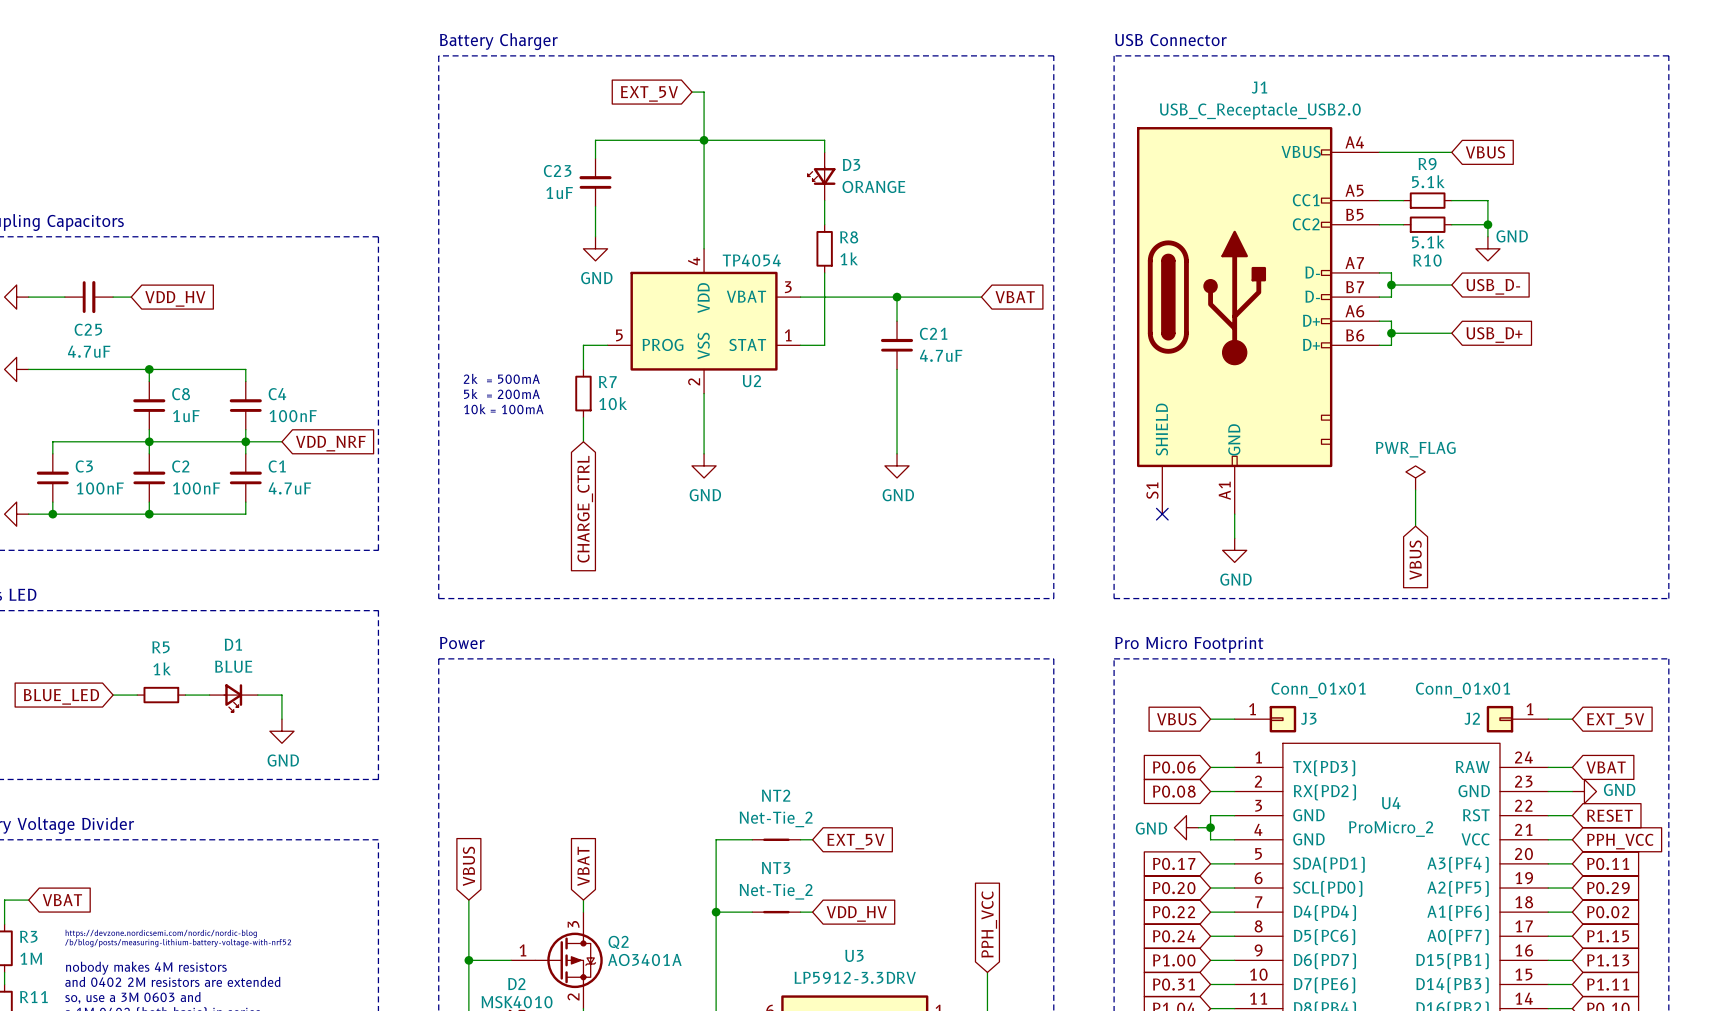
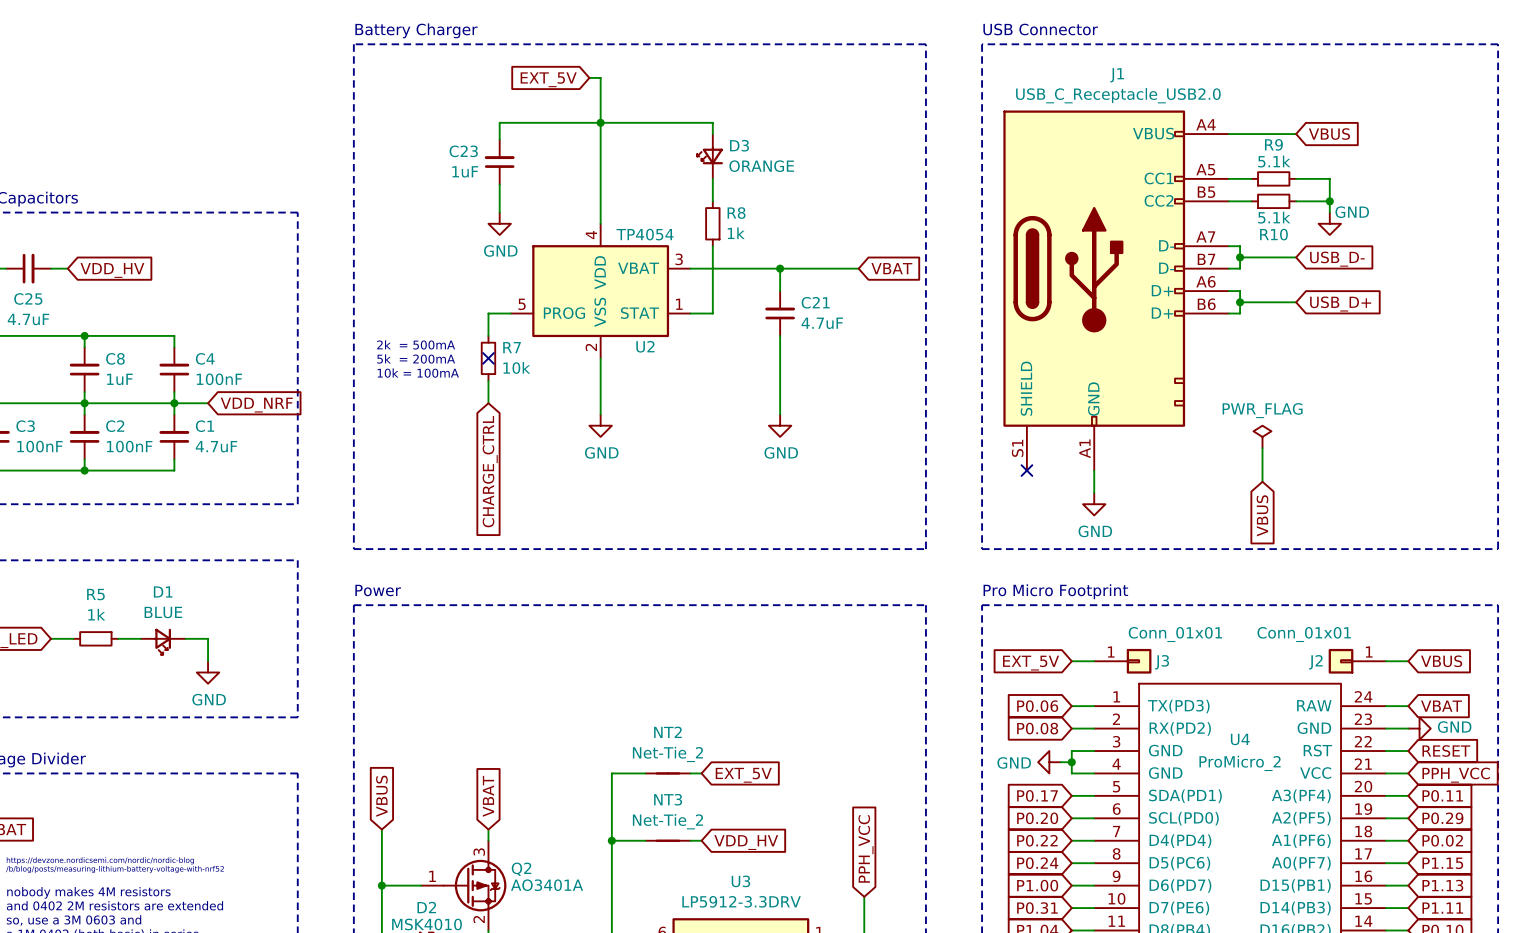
no-connect mark: none -> (488, 358)
global label: VBUS (1176, 719) -> EXT_5V (1031, 663)
global label: EXT_5V (1615, 720) -> VBUS (1441, 661)

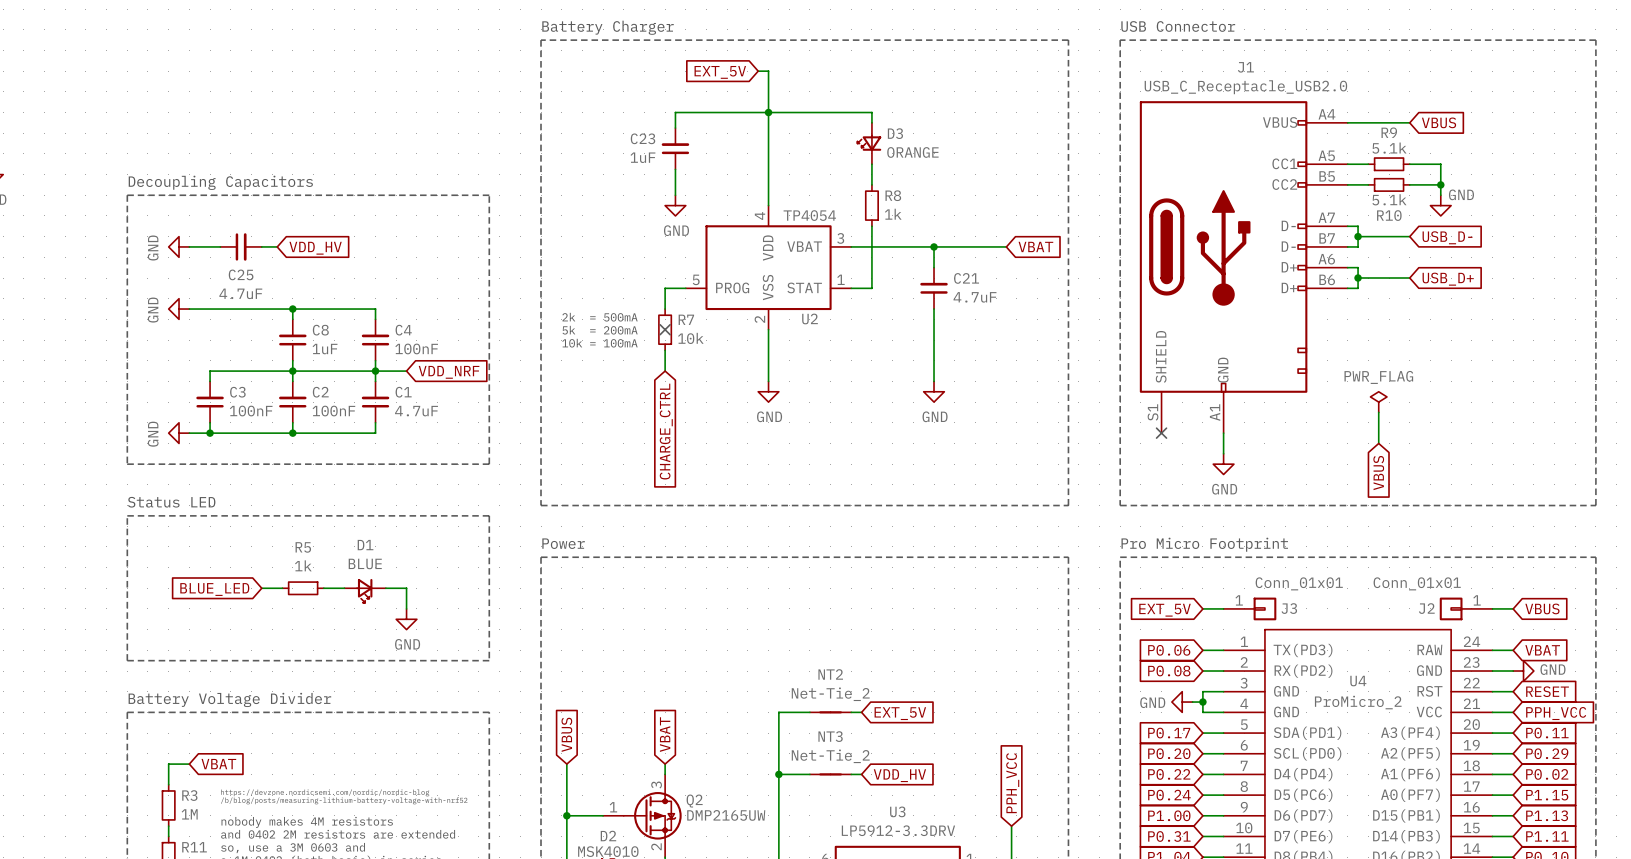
Q2 value: AO3401A (547, 885) -> DMP2165UW (726, 815)

